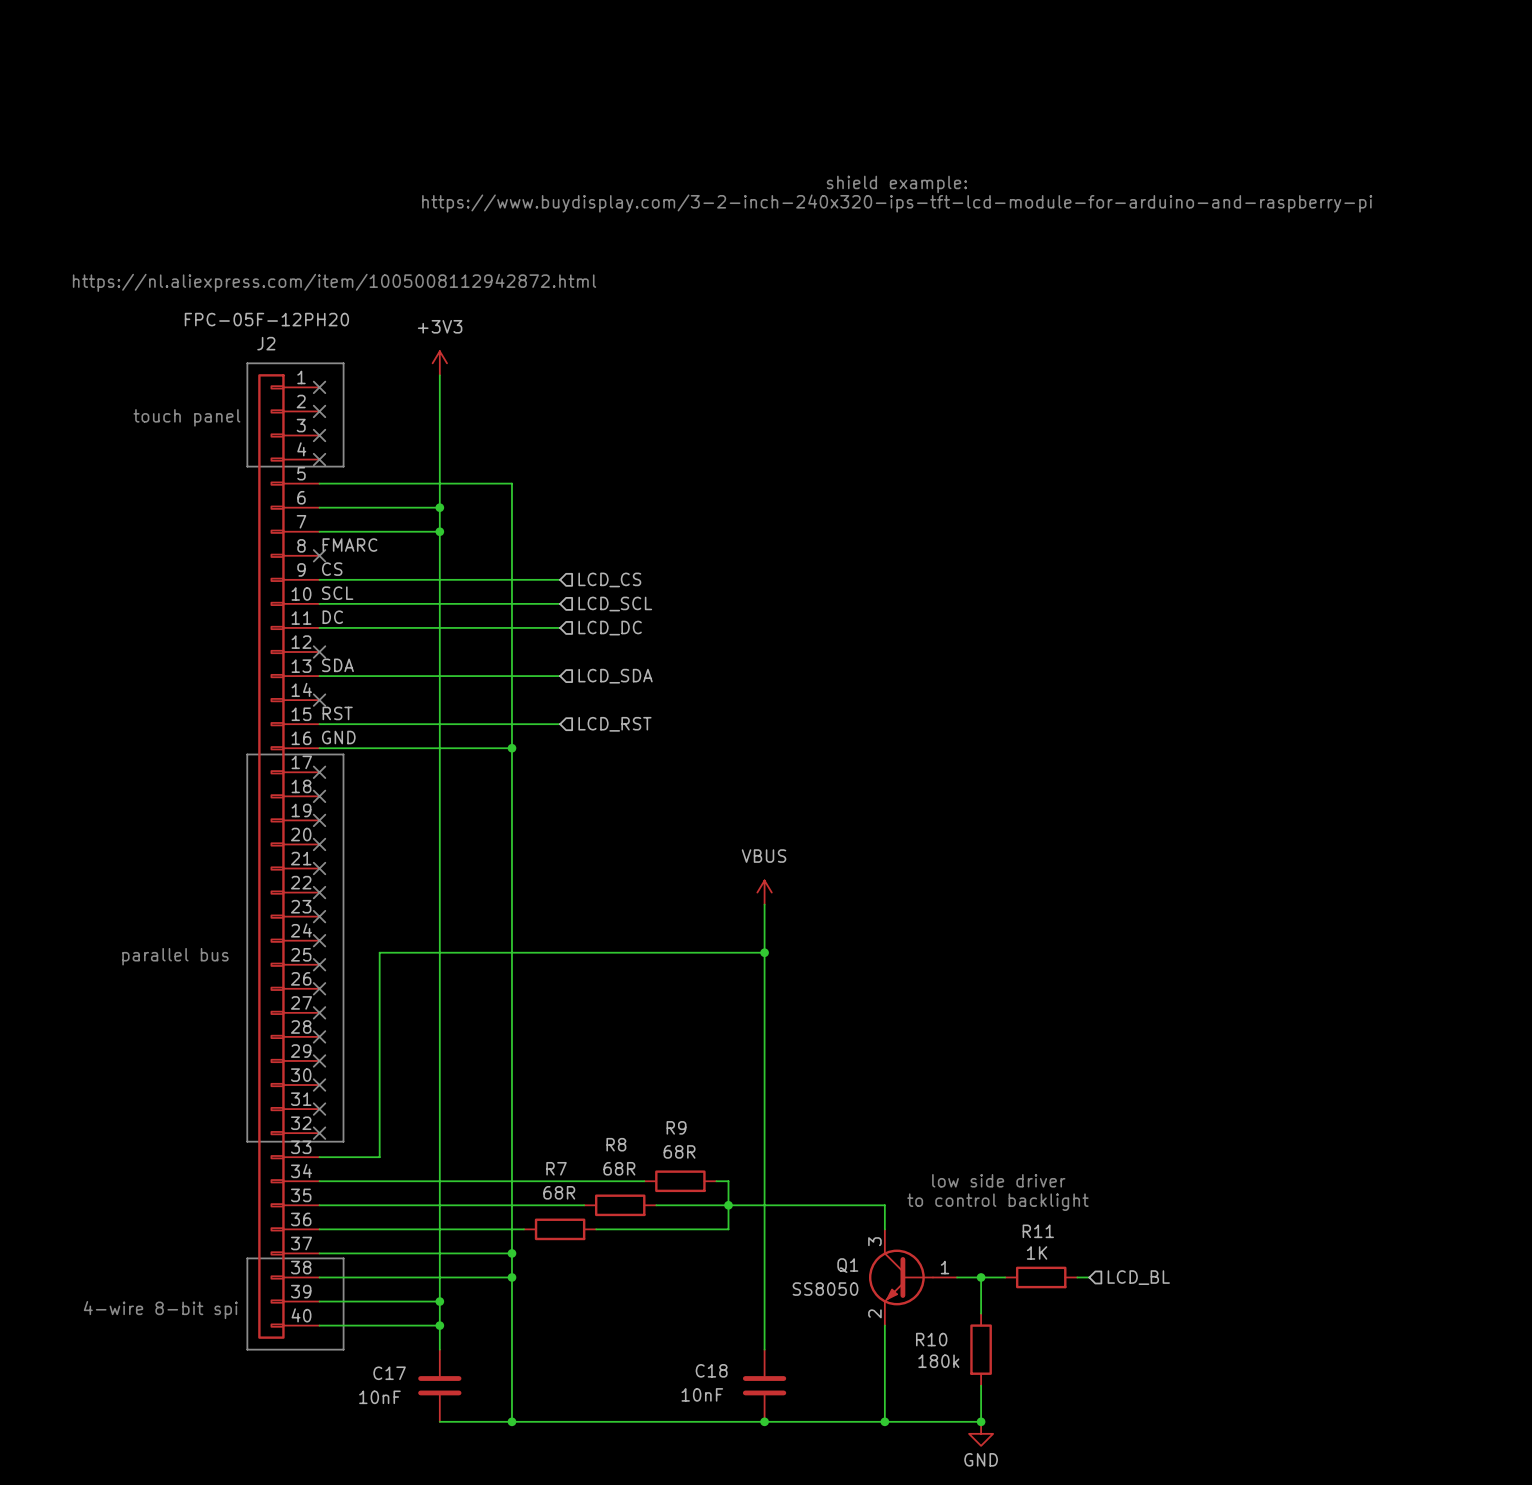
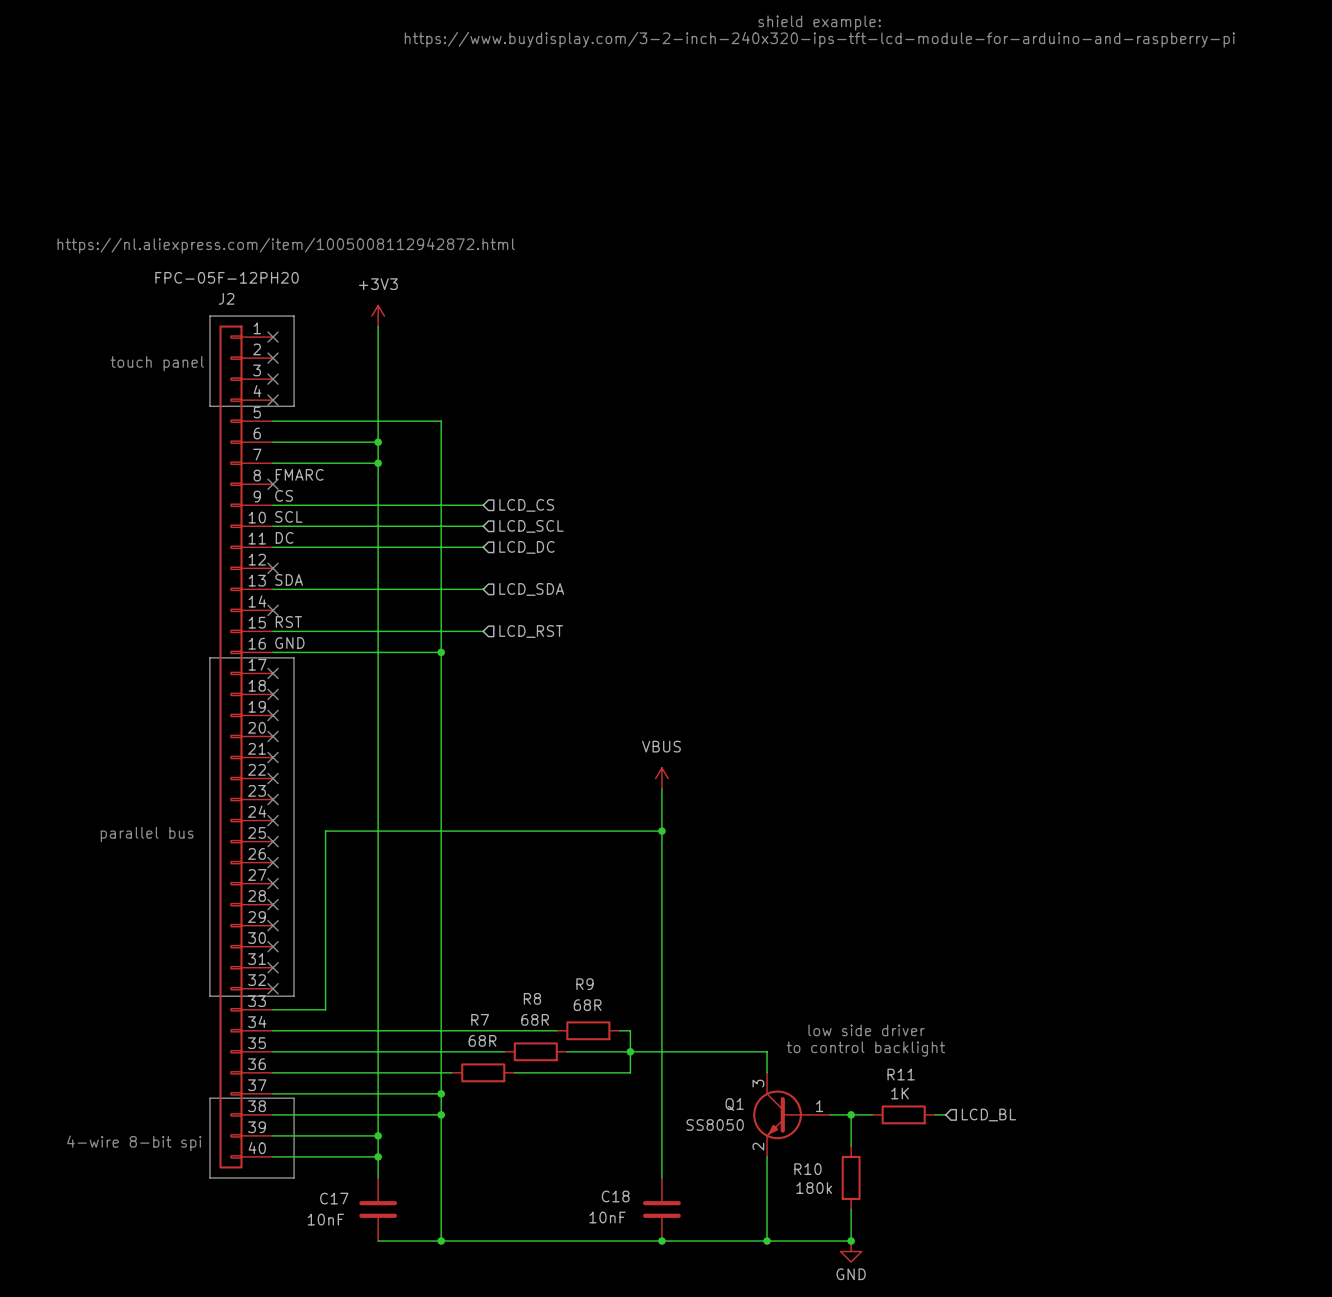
text position: shield example: (896, 184) -> shield example: (819, 23)
text position: https://www.buydisplay.com/3-2-inch-240x320-ips-tft-lcd-module-for-arduino-and-raspberry-pi (897, 203) -> https://www.buydisplay.com/3-2-inch-240x320-ips-tft-lcd-module-for-arduino-and-raspberry-pi (819, 39)

